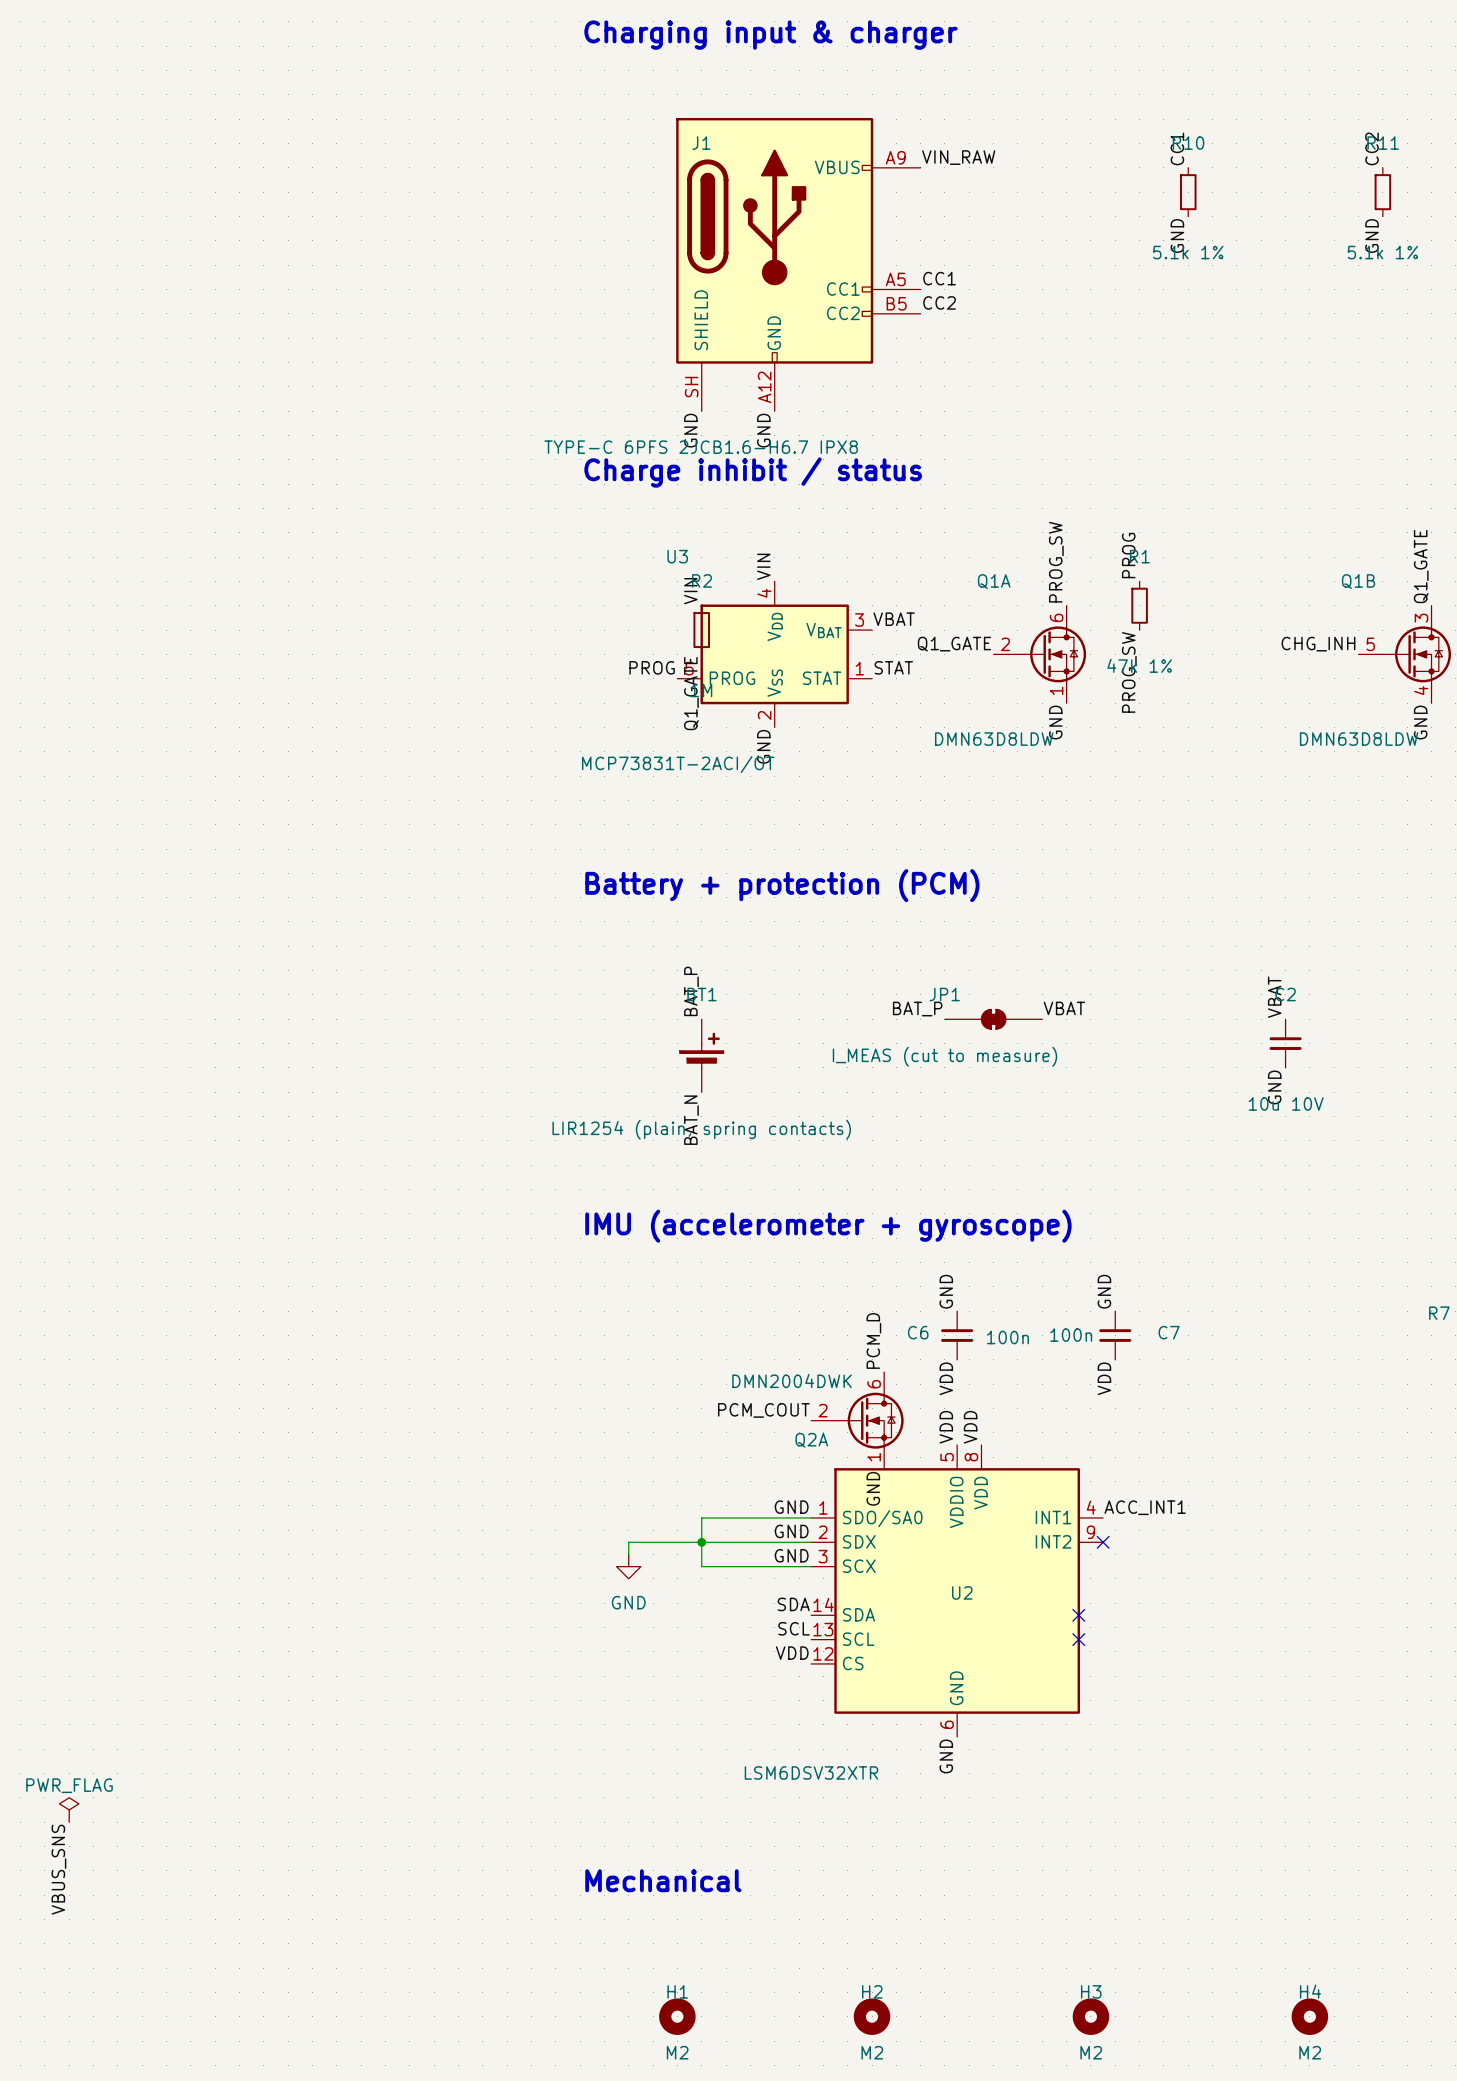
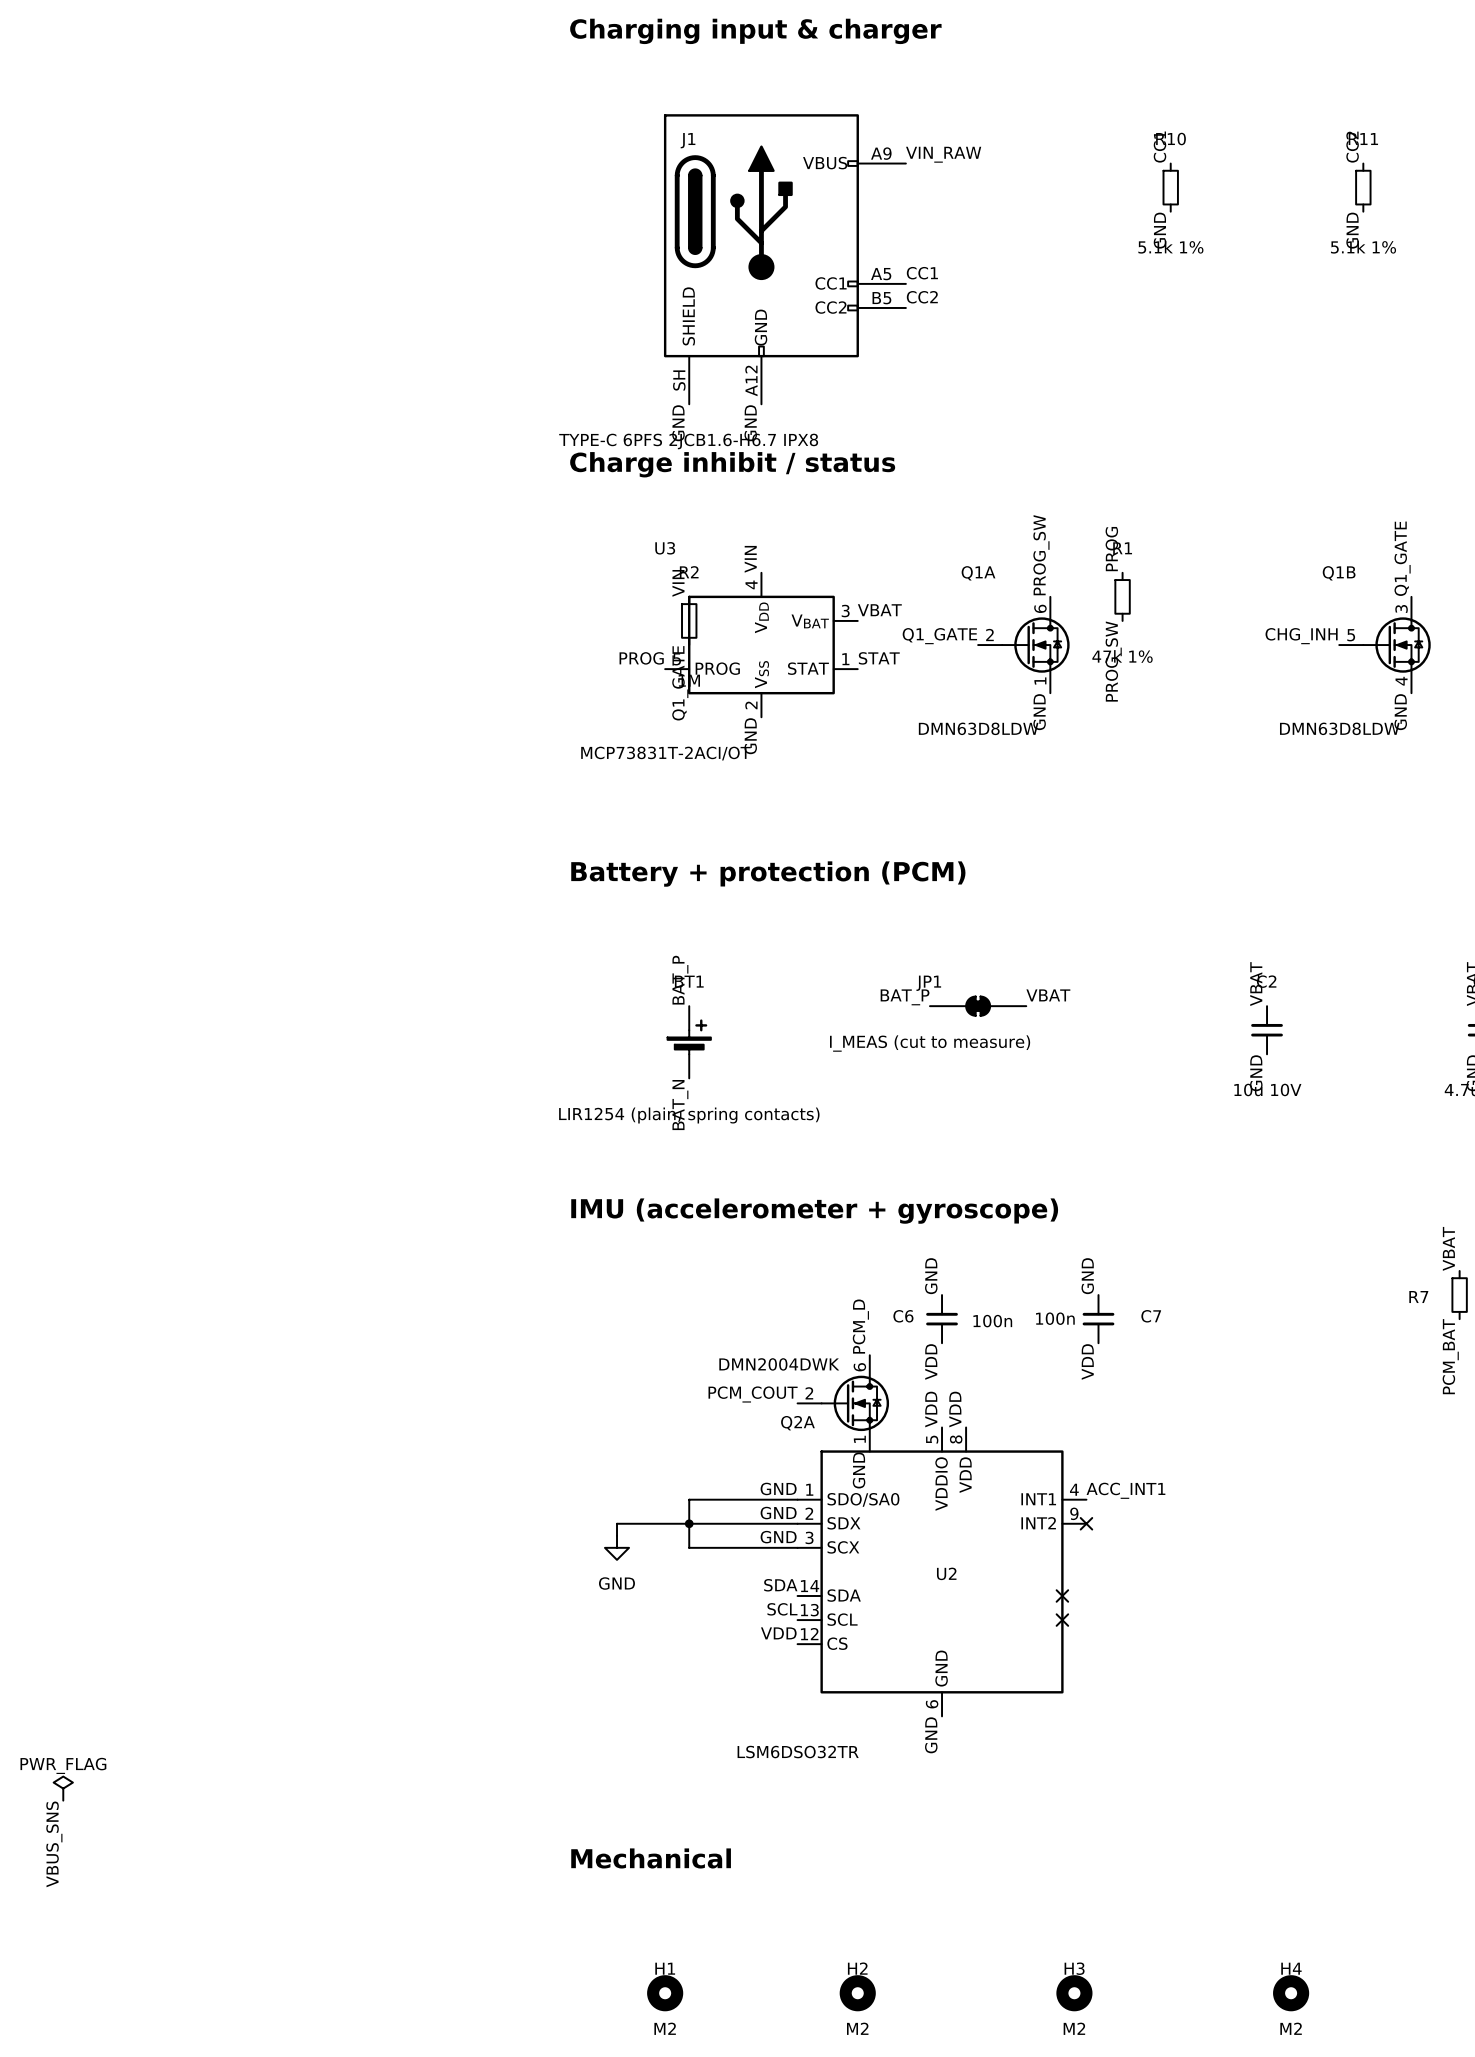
U2 value: LSM6DSV32XTR (811, 1772) -> LSM6DSO32TR (798, 1752)

